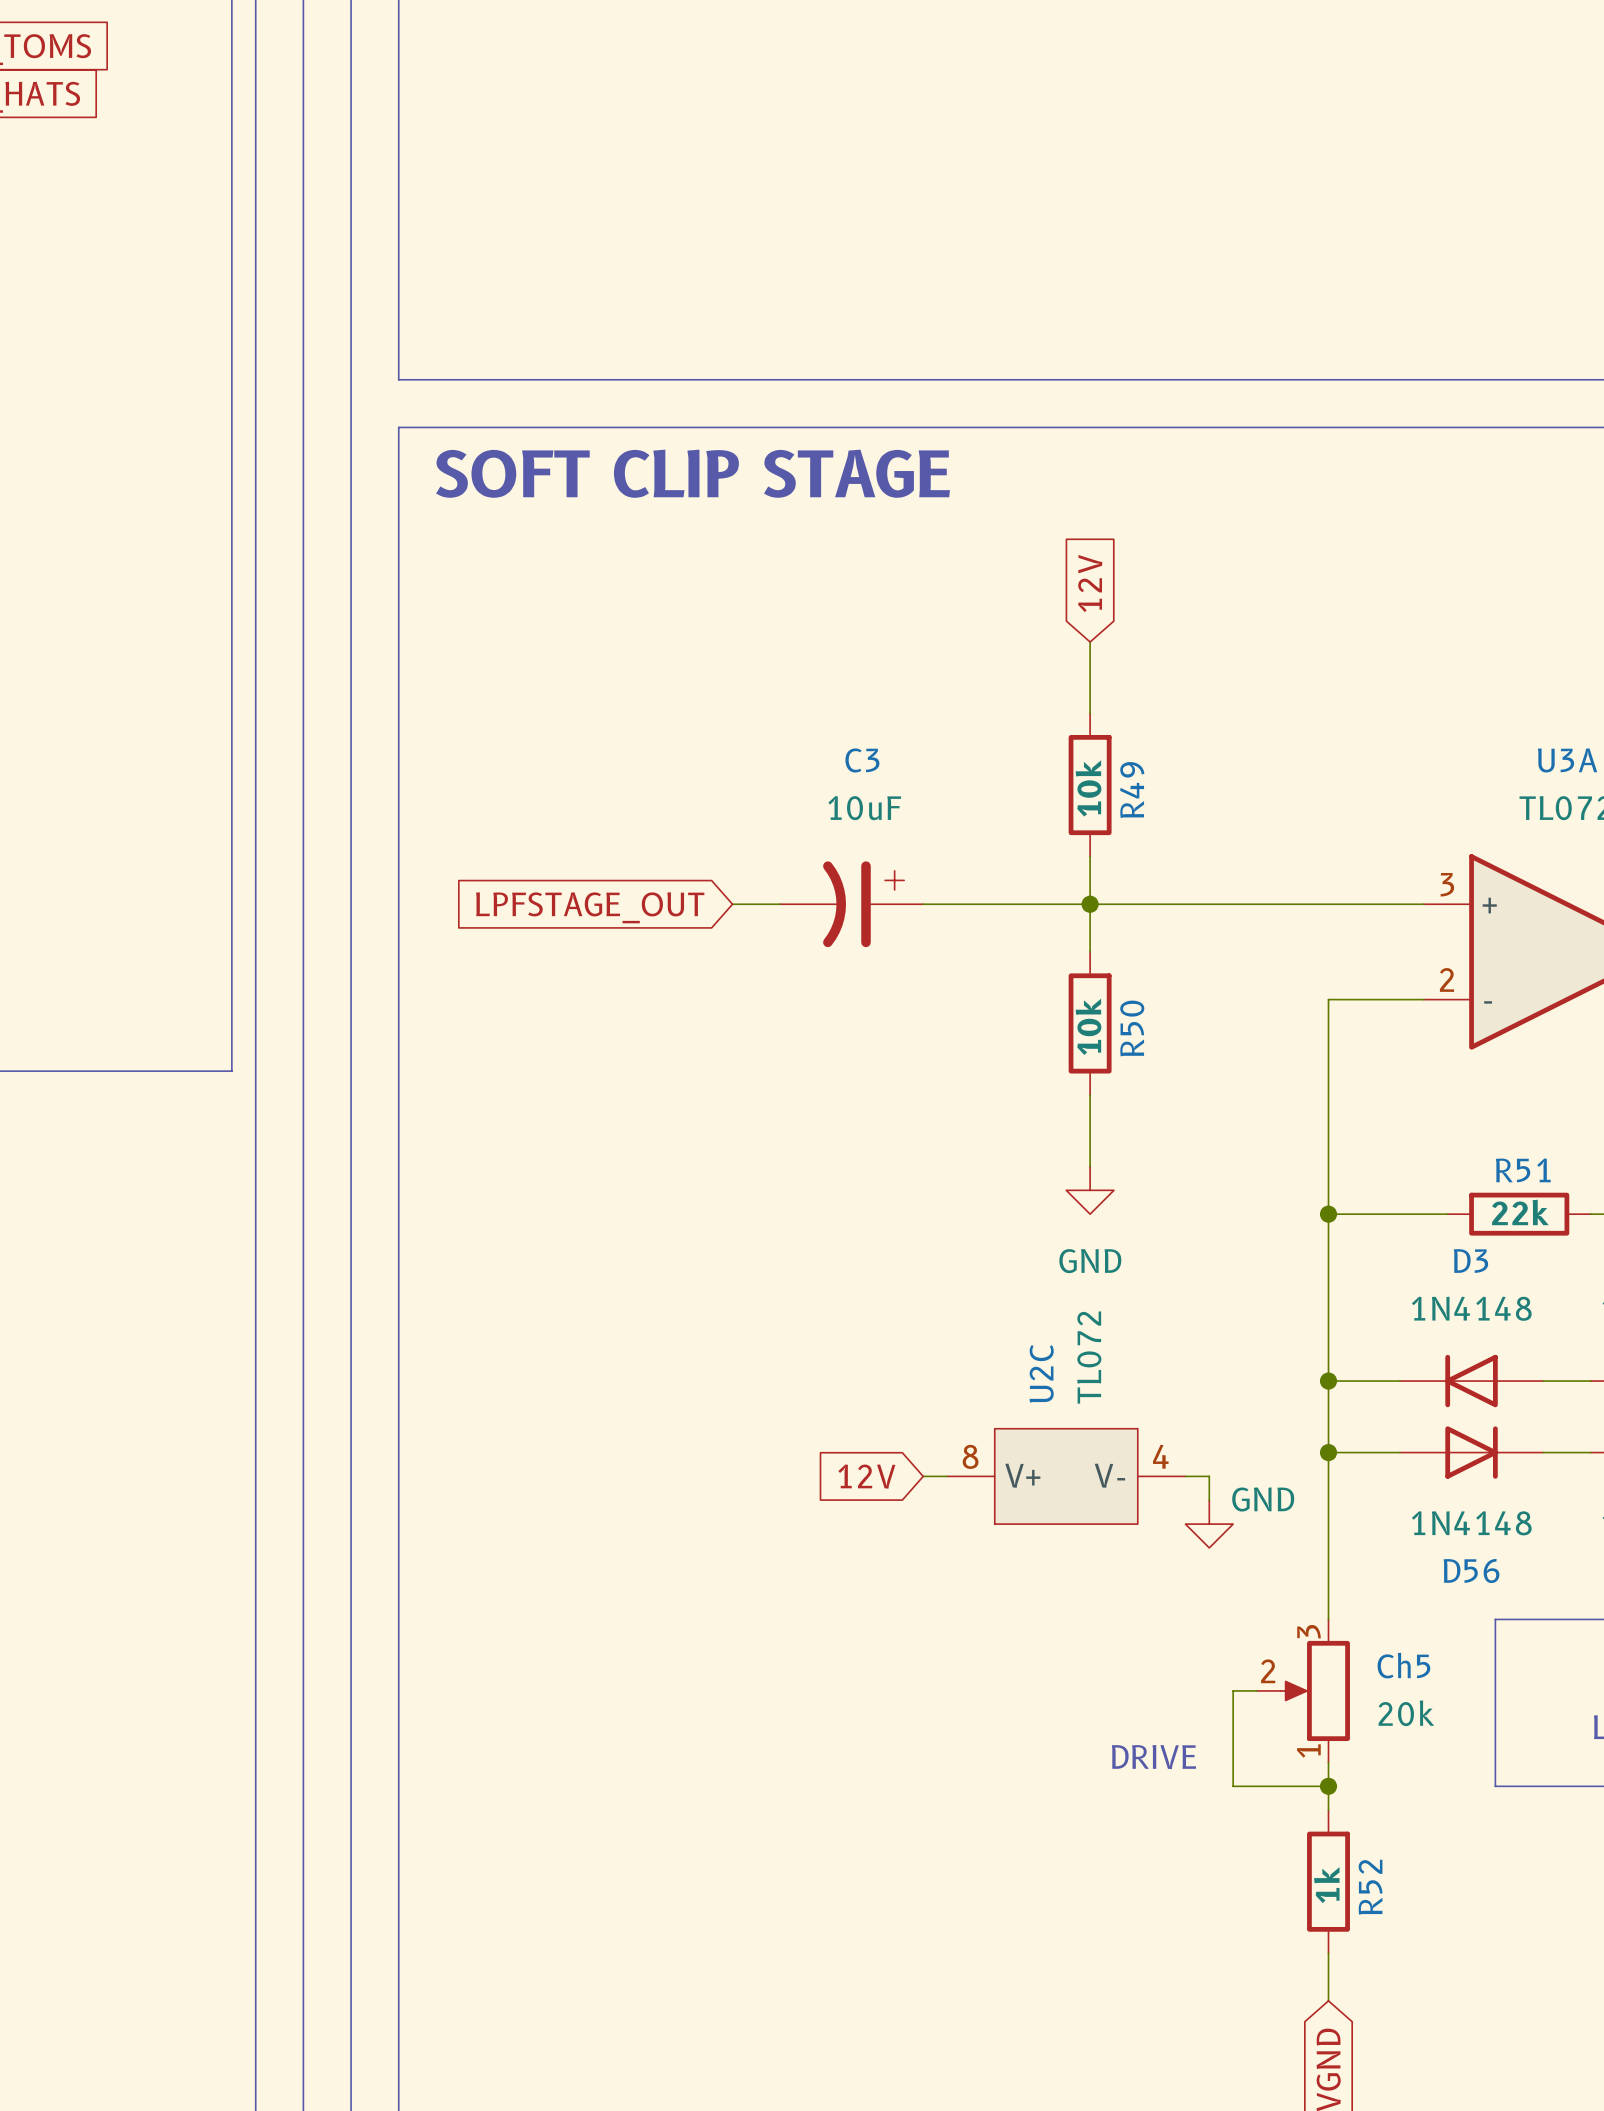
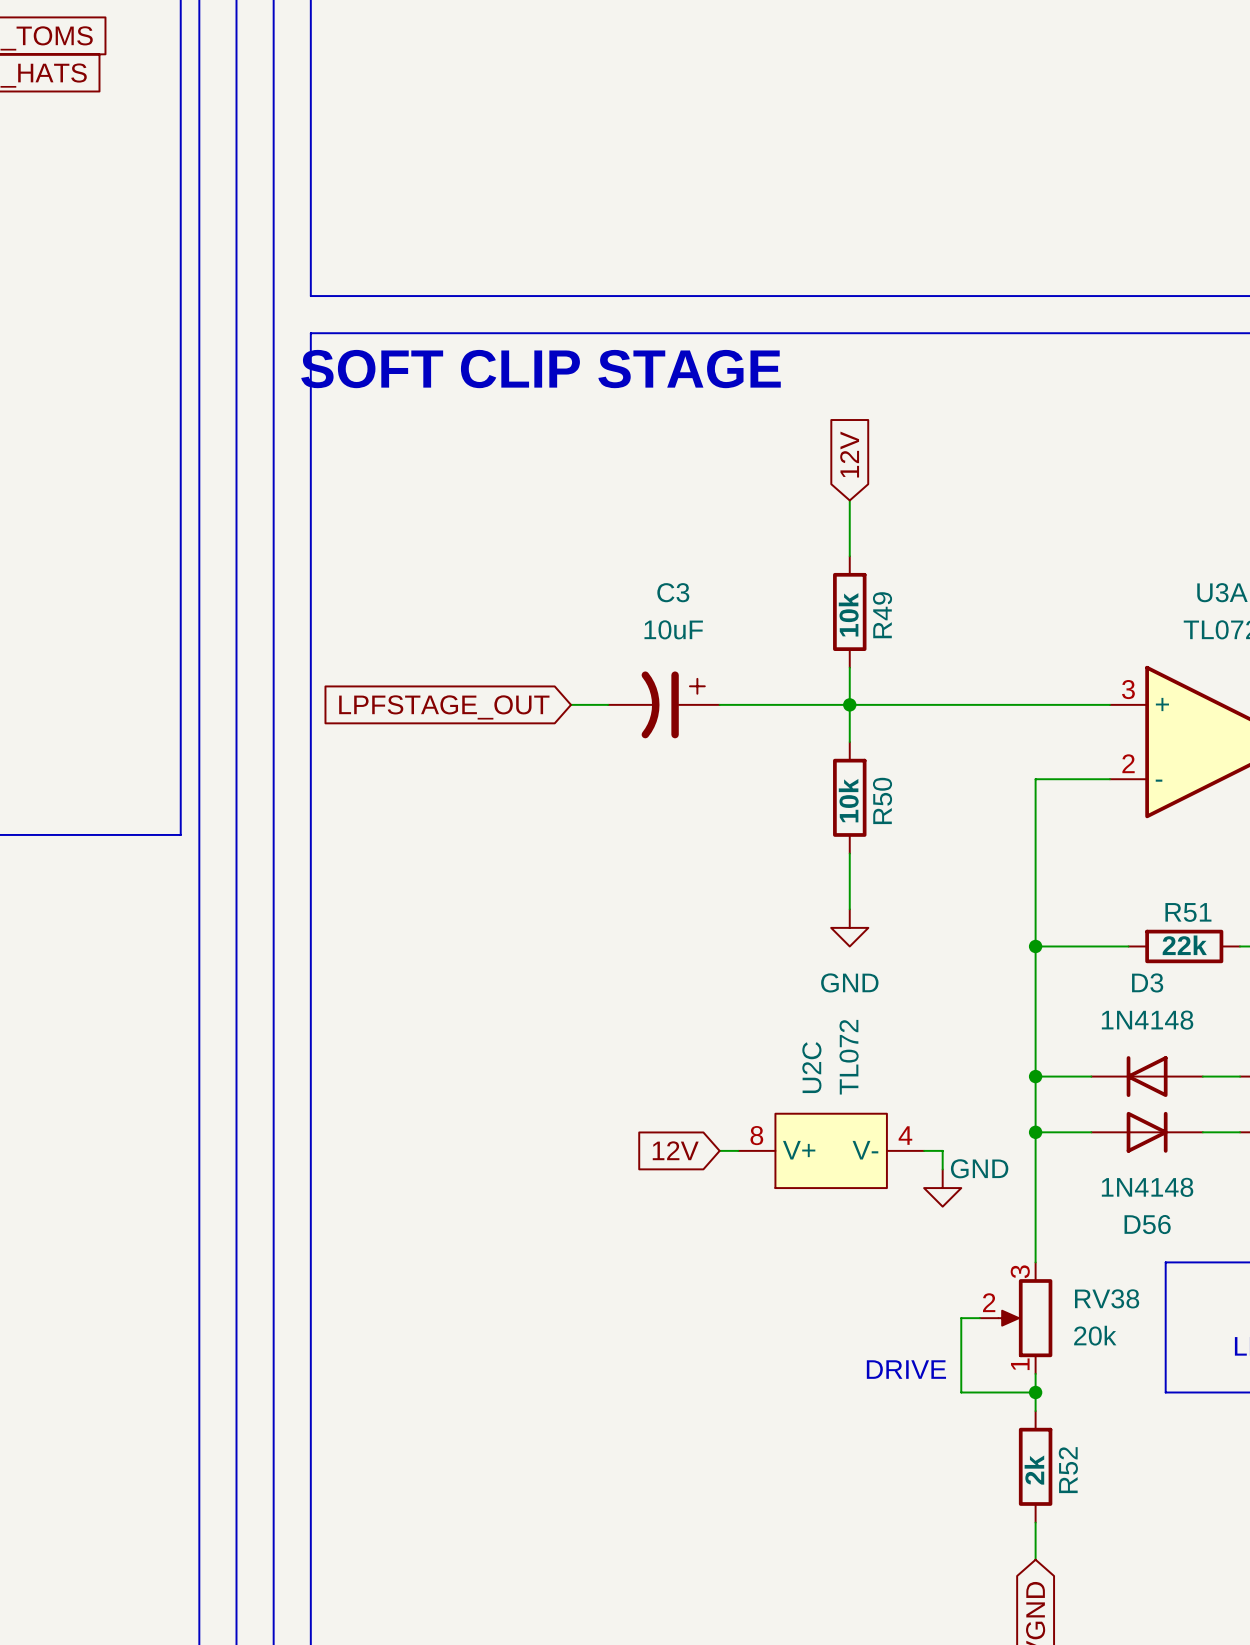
Ch5 name: Ch5 (1403, 1665) -> RV38 (1107, 1298)
R52 value: 1k (1326, 1885) -> 2k (1034, 1470)

